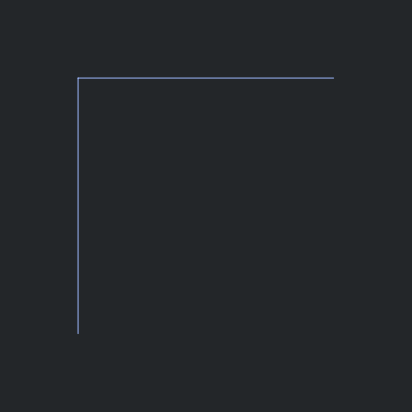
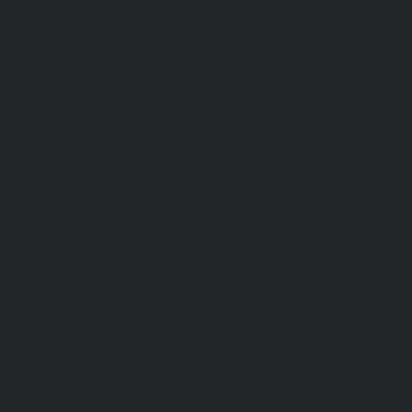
line: (333, 78) (78, 78) (78, 333) -> none

